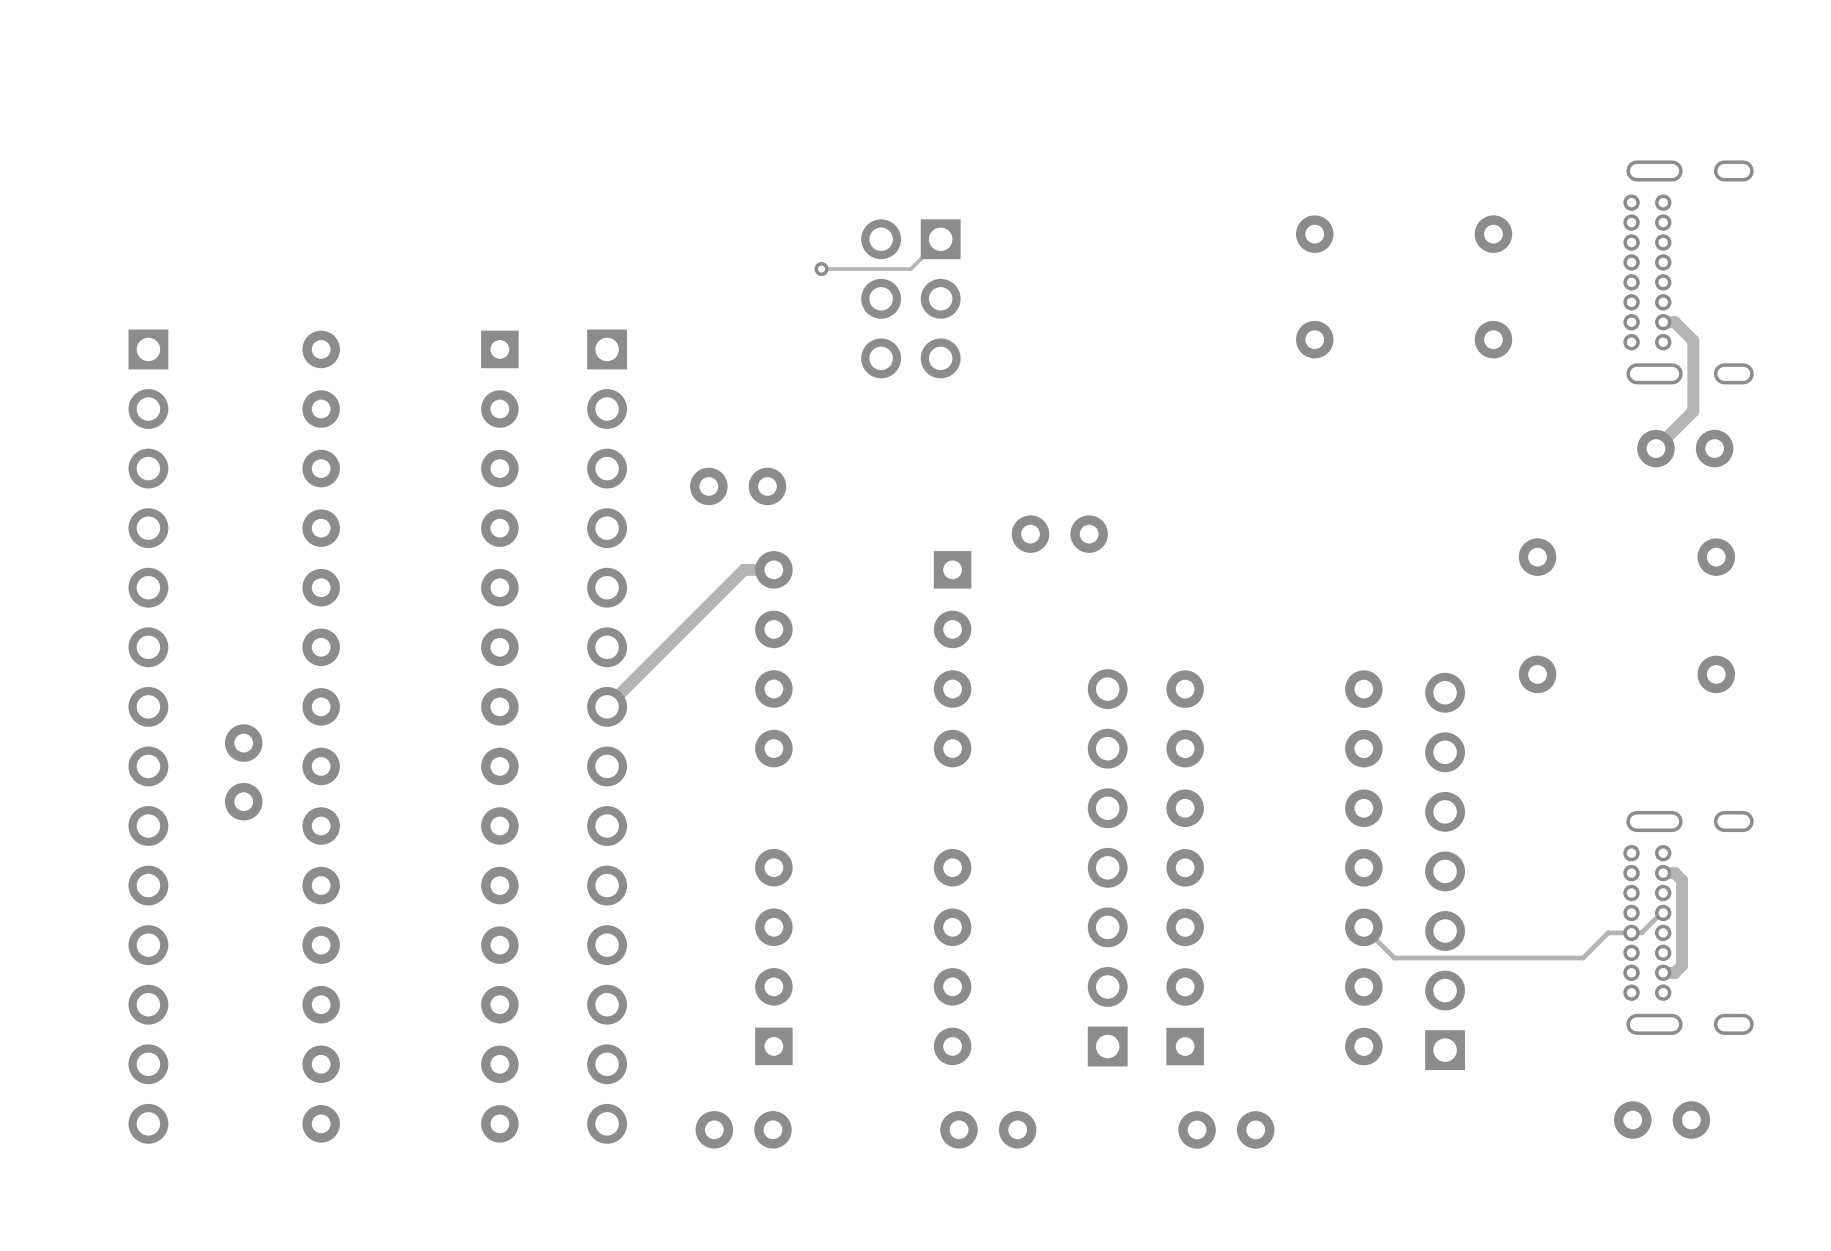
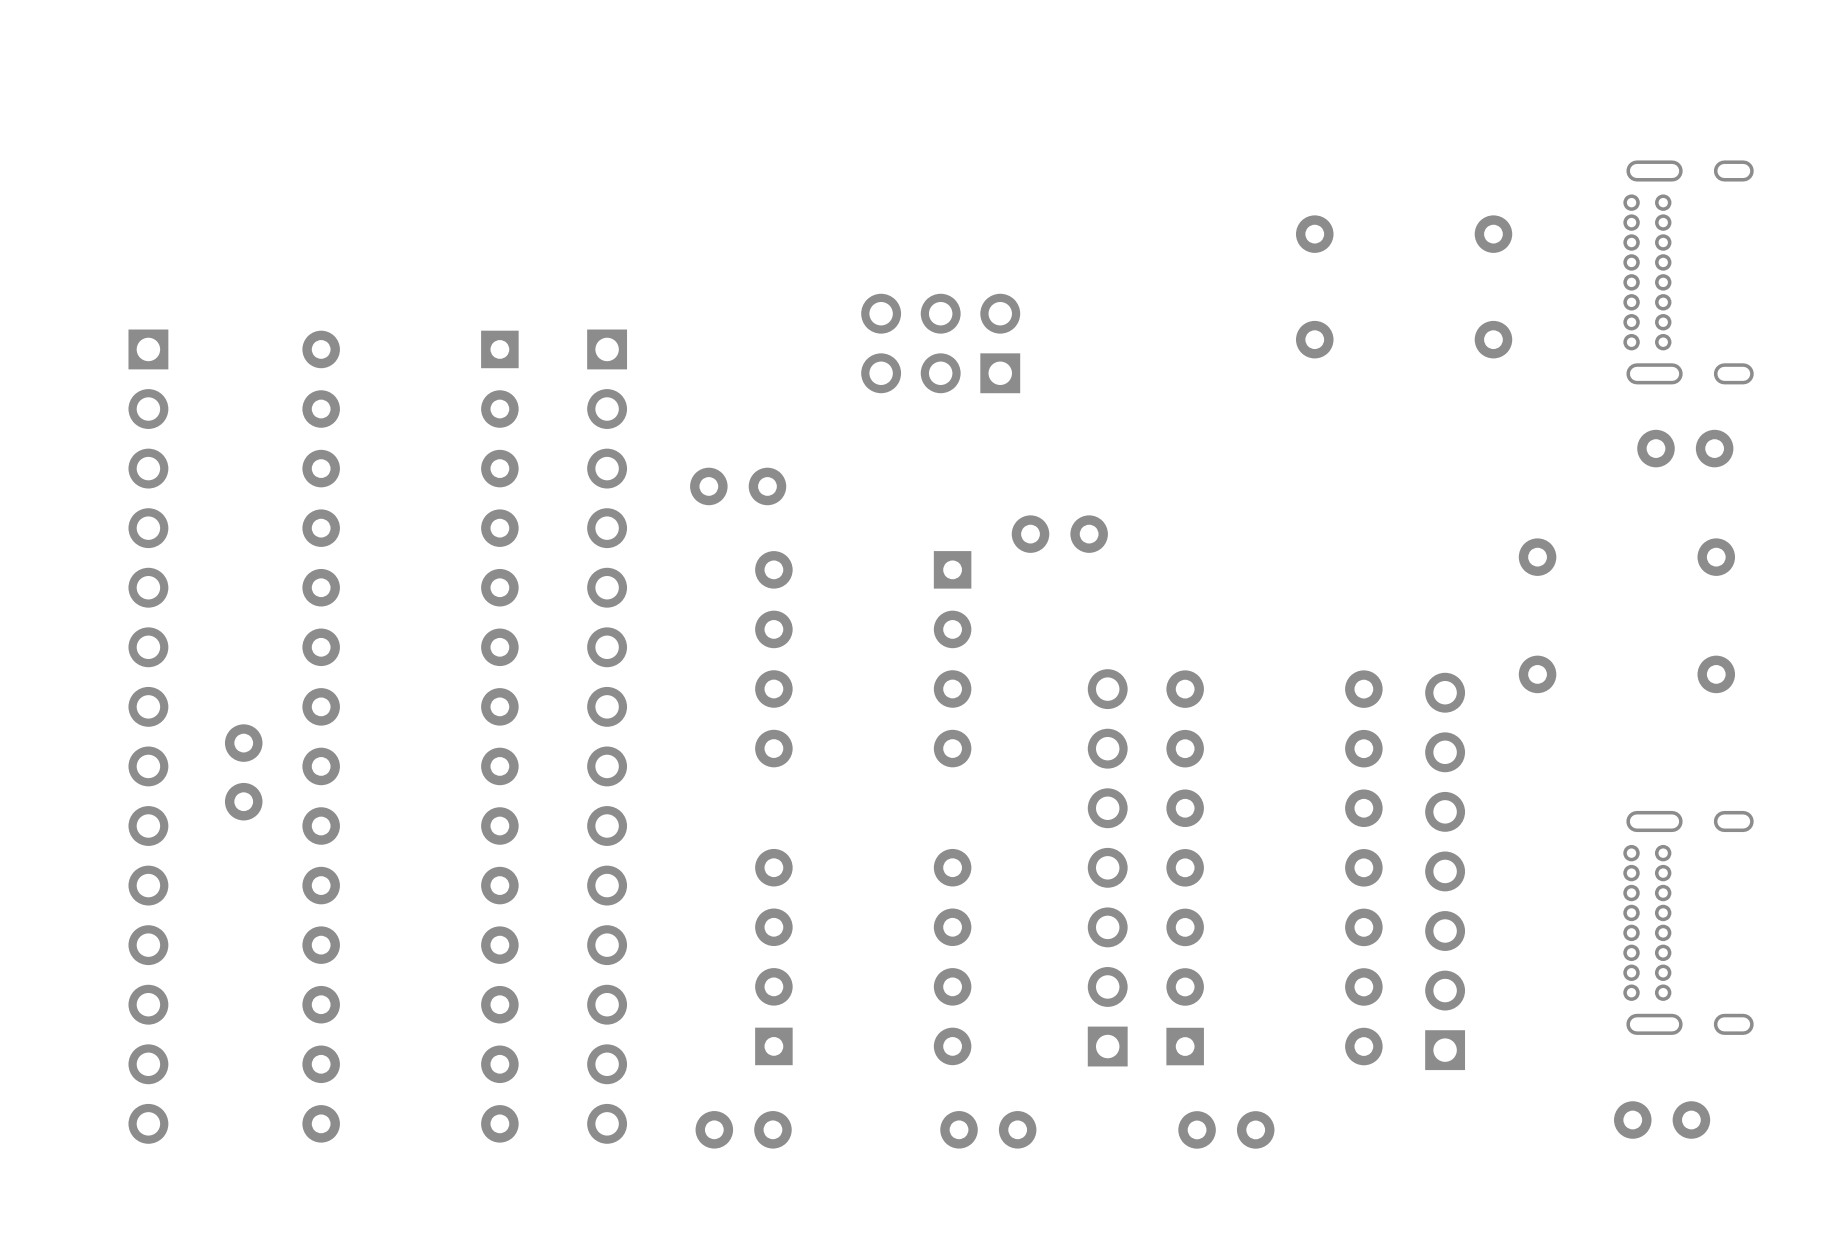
track: (940, 239) (910, 269) (821, 269) -> none
via: (821, 269) -> none
part rotation: 0° (910, 298) -> 90° clockwise (940, 343)
track: (1663, 322) (1674, 322) (1693, 340) (1693, 411) (1655, 448) -> none
track: (773, 569) (744, 569) (607, 706) -> none
track: (1663, 873) (1674, 873) (1682, 880) (1682, 965) (1674, 972) (1663, 972) -> none
track: (1663, 912) (1641, 932) (1608, 932) (1583, 958) (1394, 958) (1363, 927) -> none

